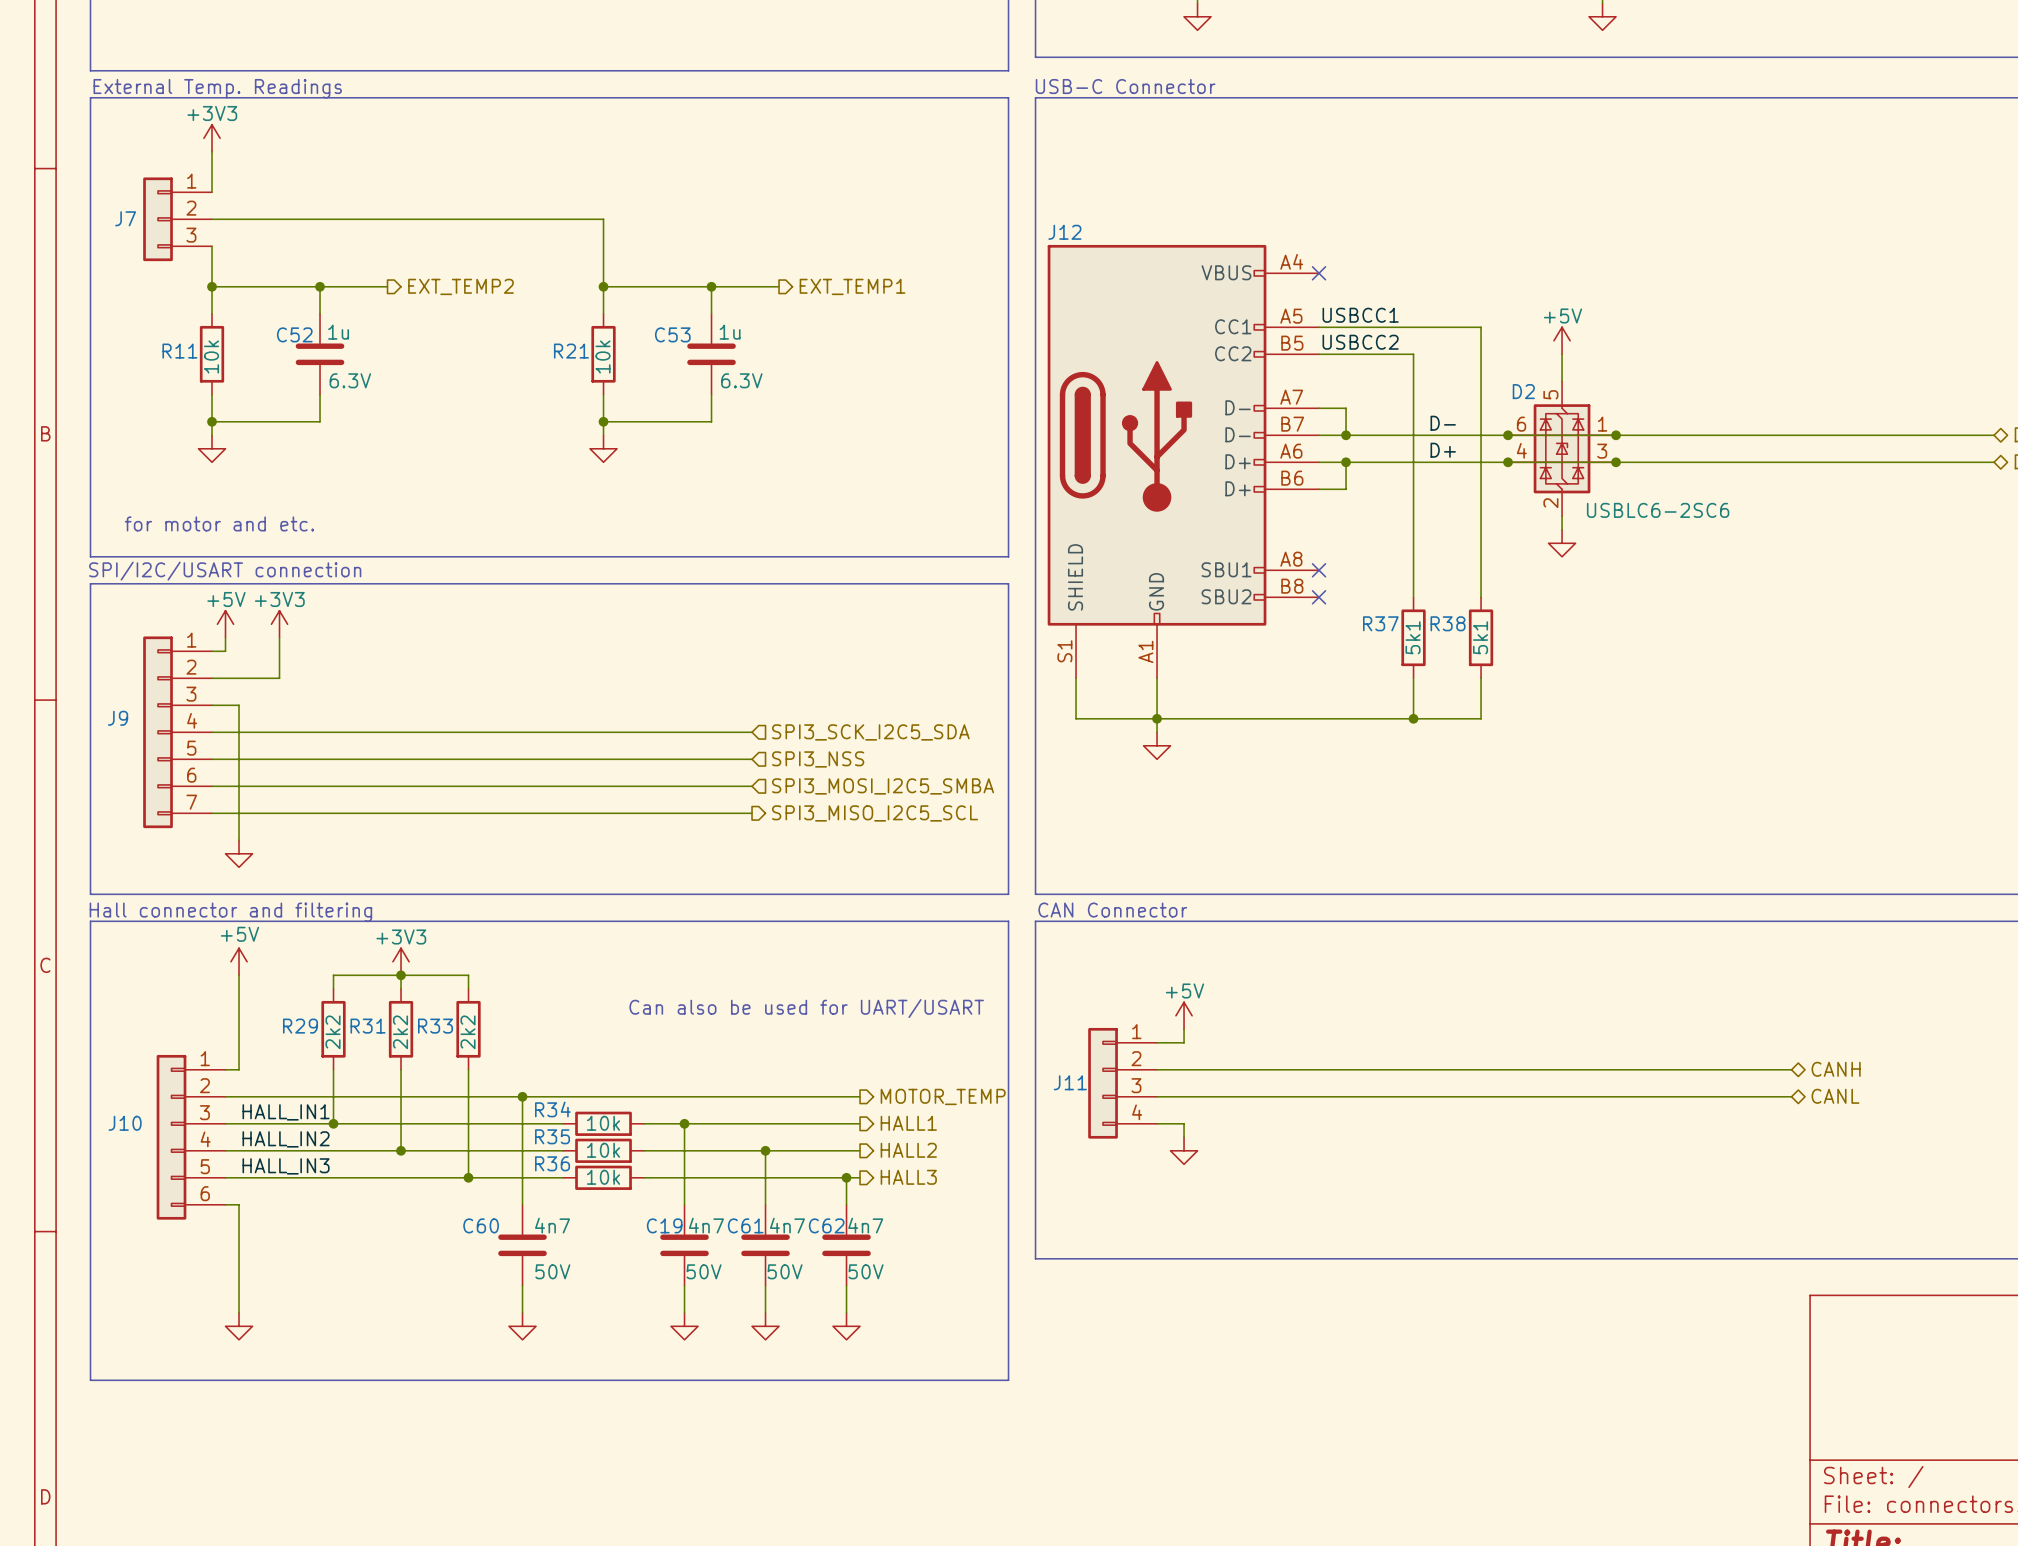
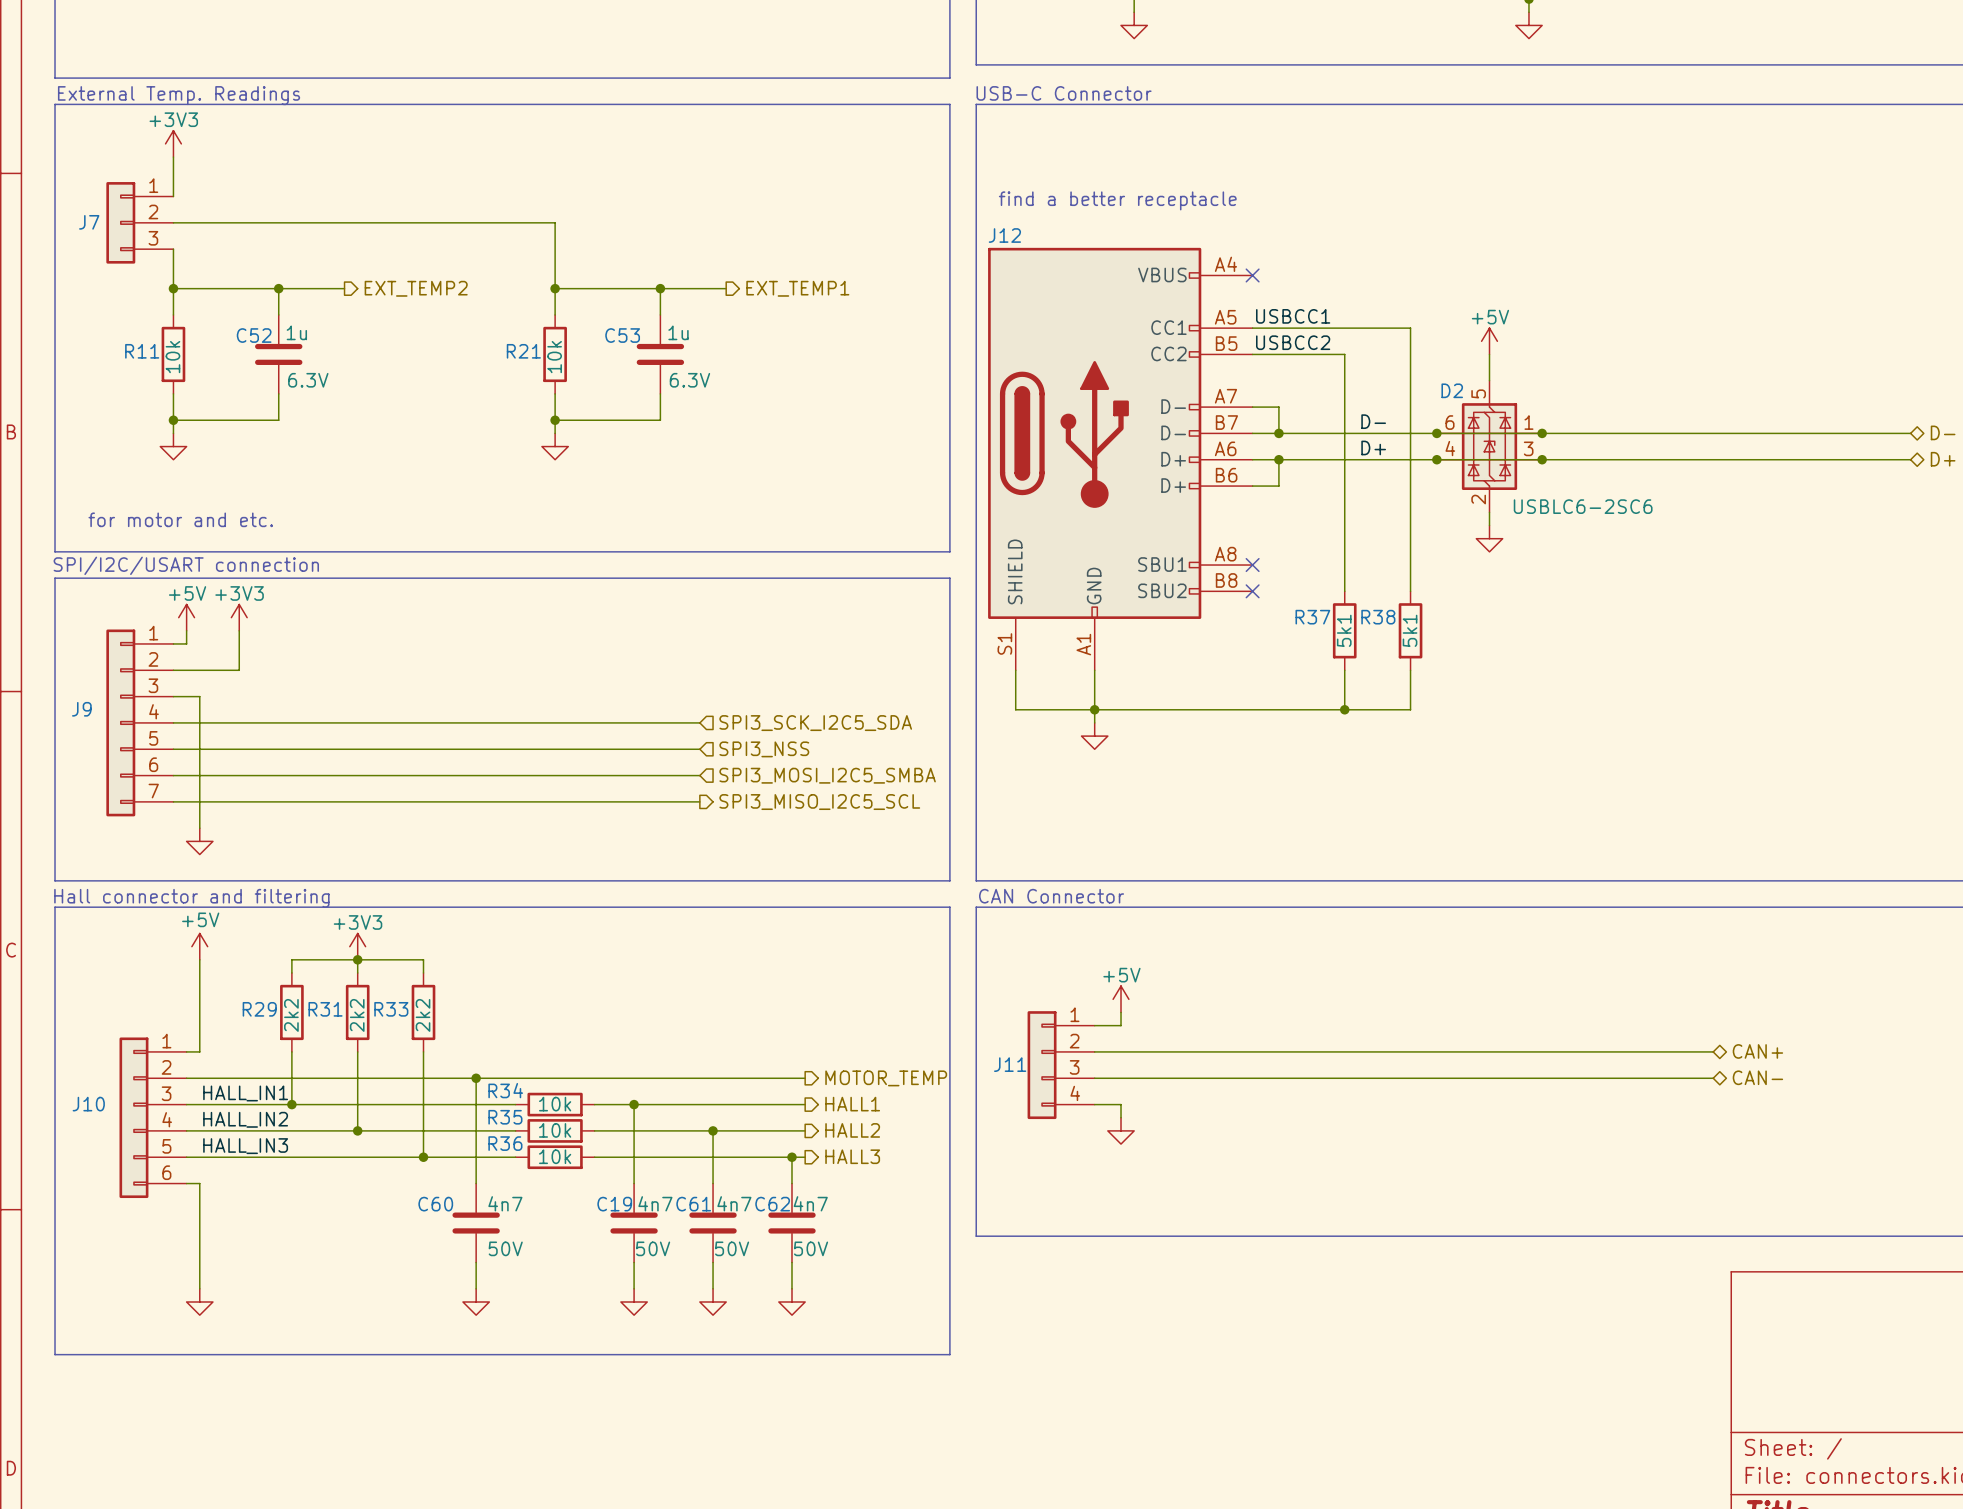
text: none -> find a better receptacle (1117, 200)
text: Can also be used for UART/USART (806, 1008) -> none
hierarchical label: CANH (1836, 1069) -> CAN+ (1757, 1051)
hierarchical label: CANL (1835, 1096) -> CAN- (1757, 1077)

